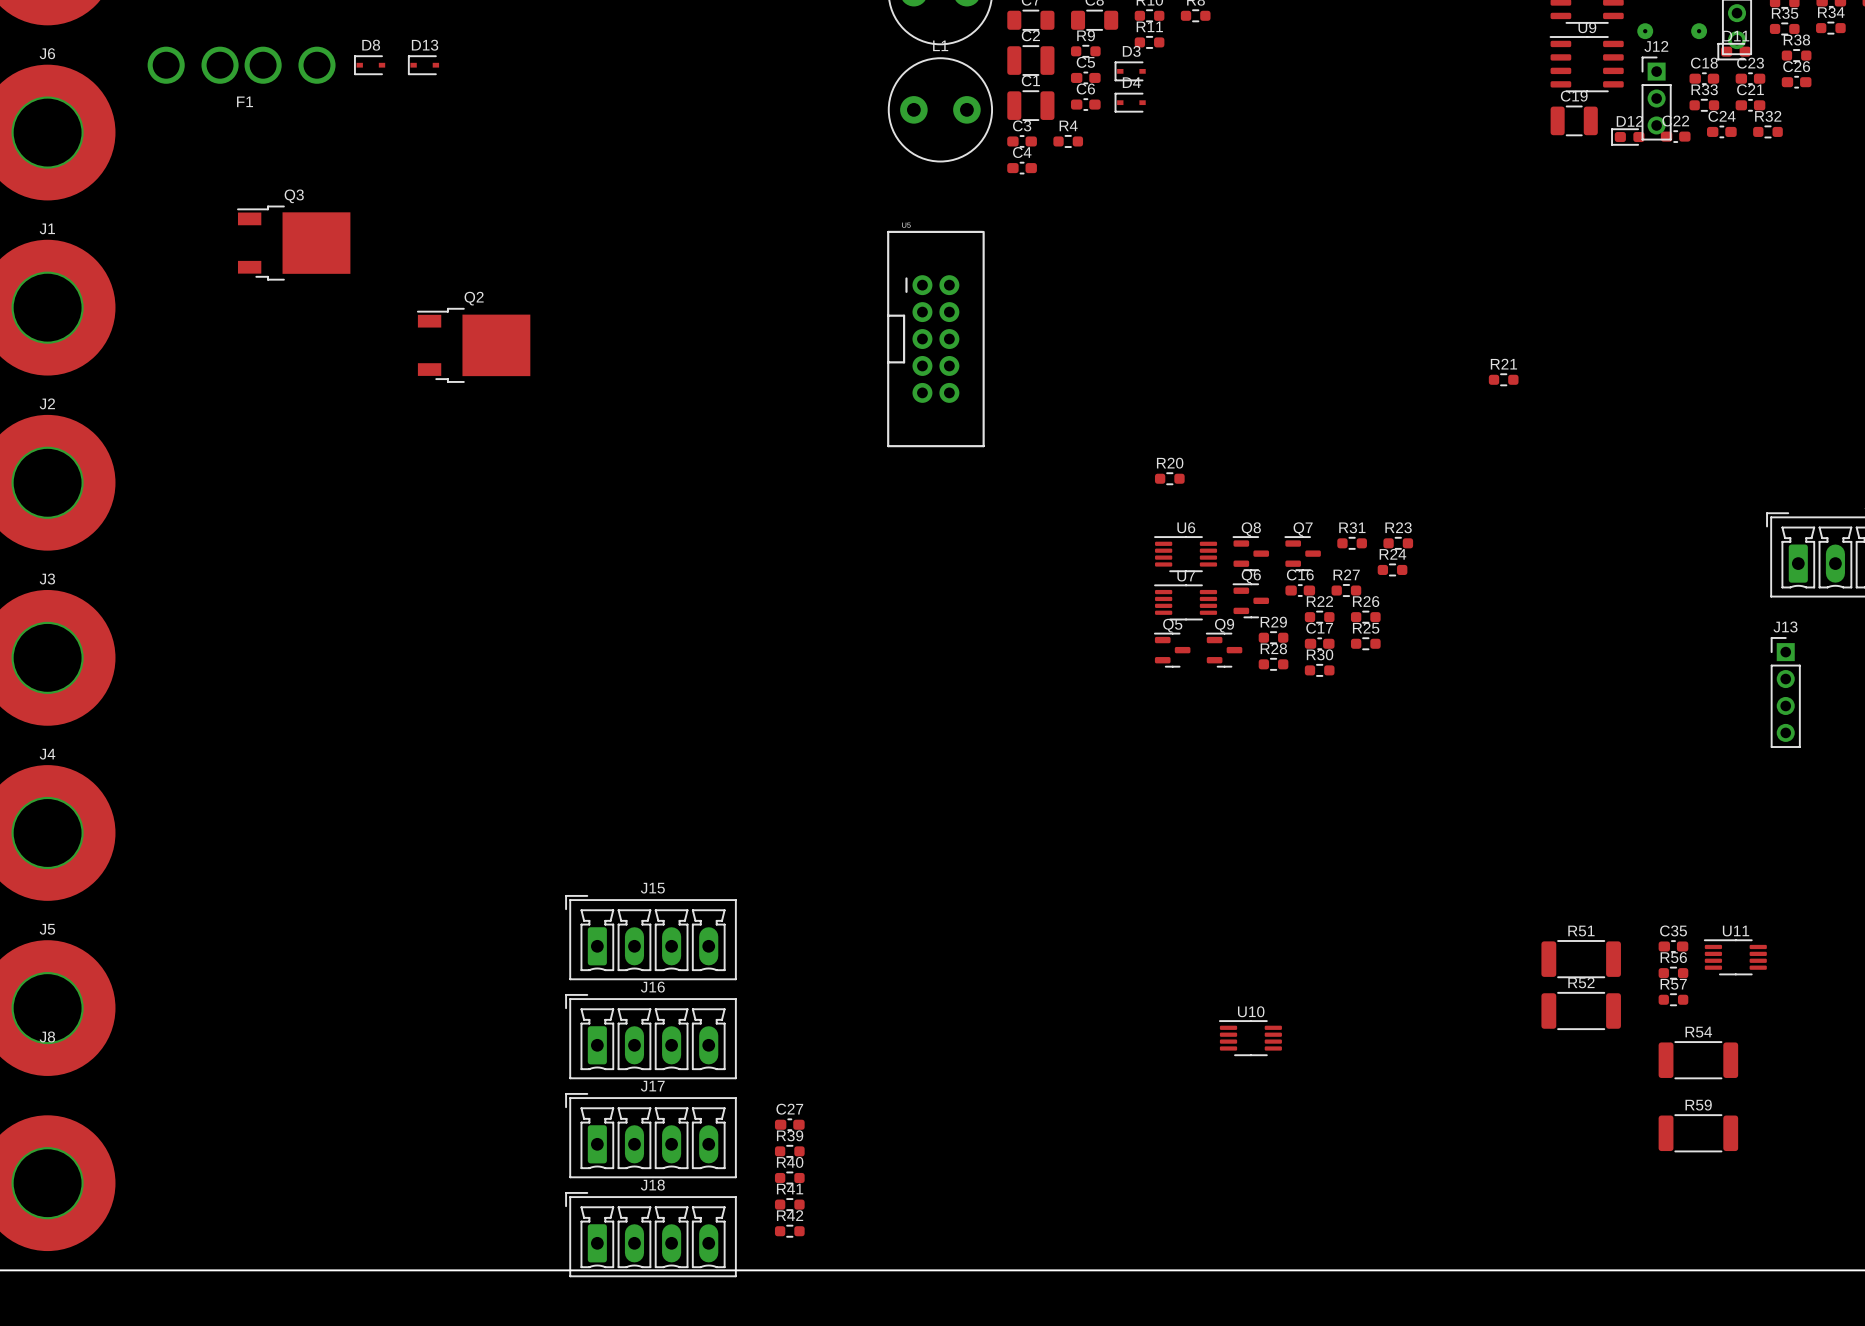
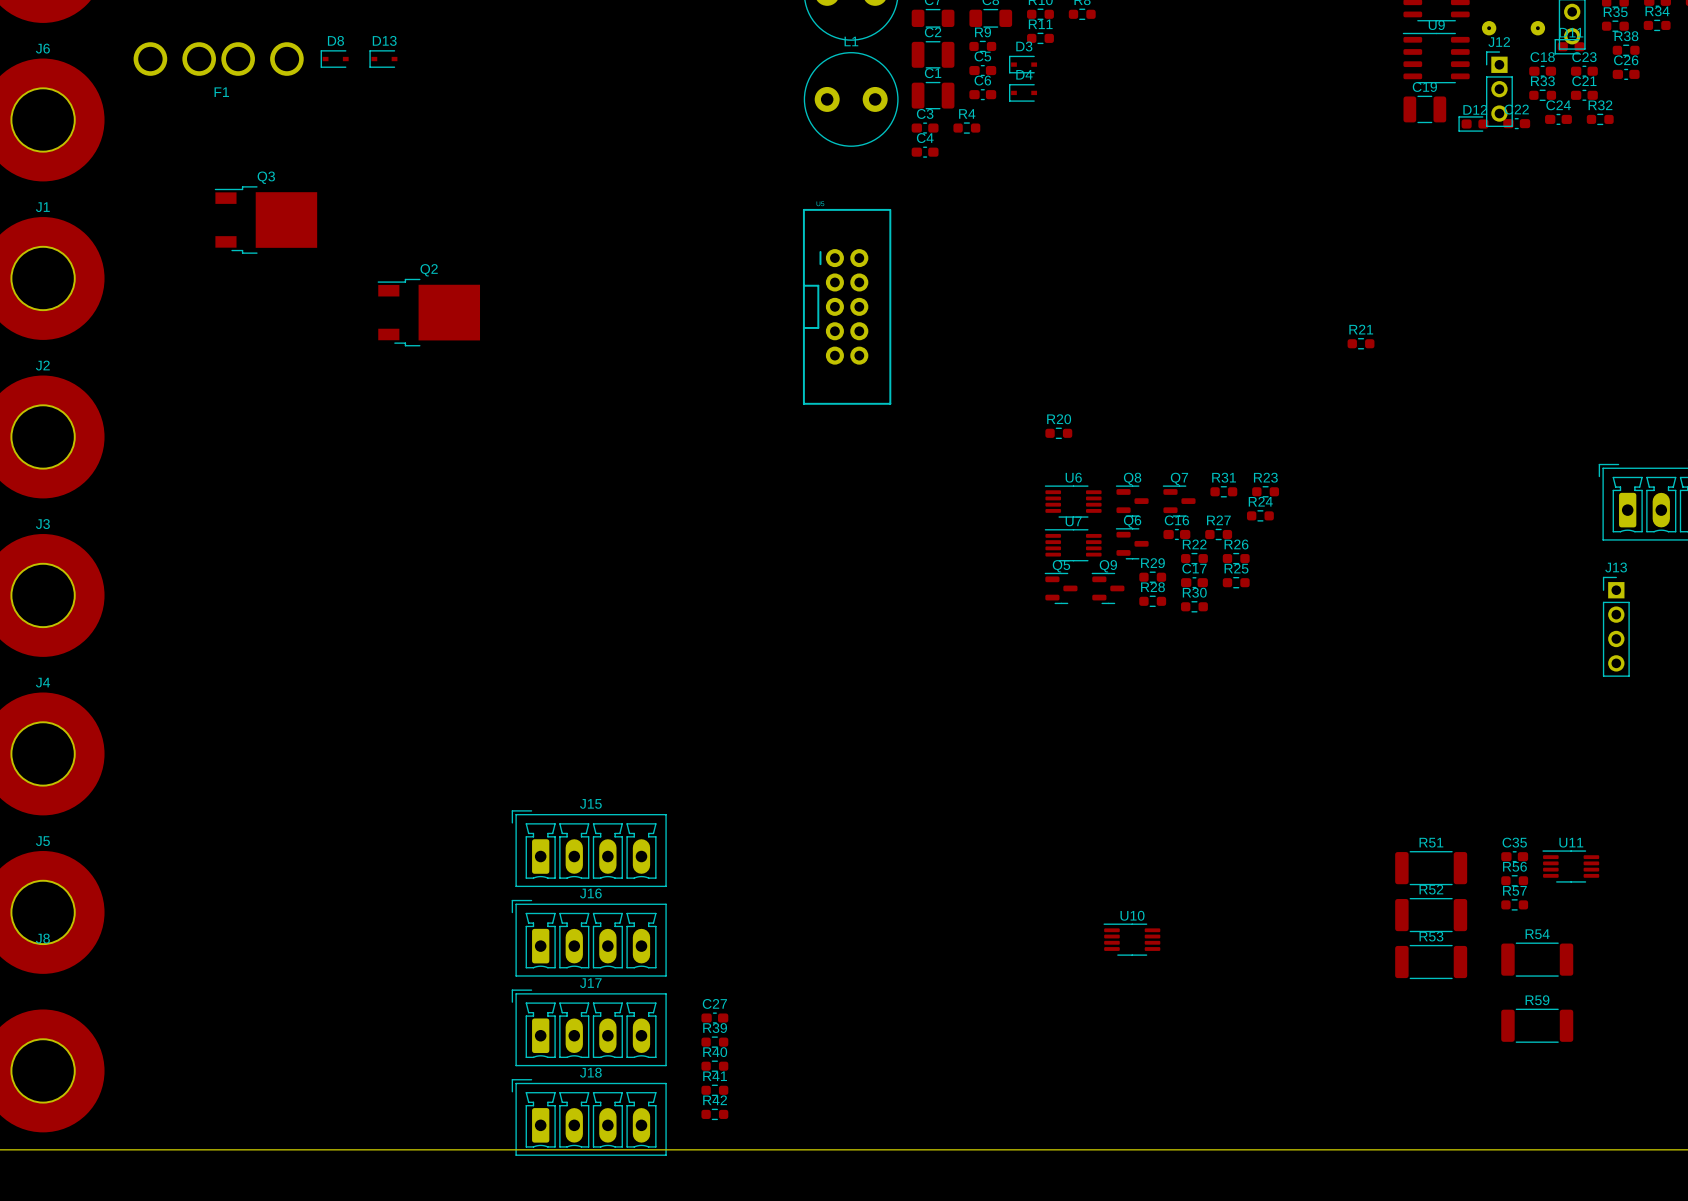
R53: none -> (1431, 962)

